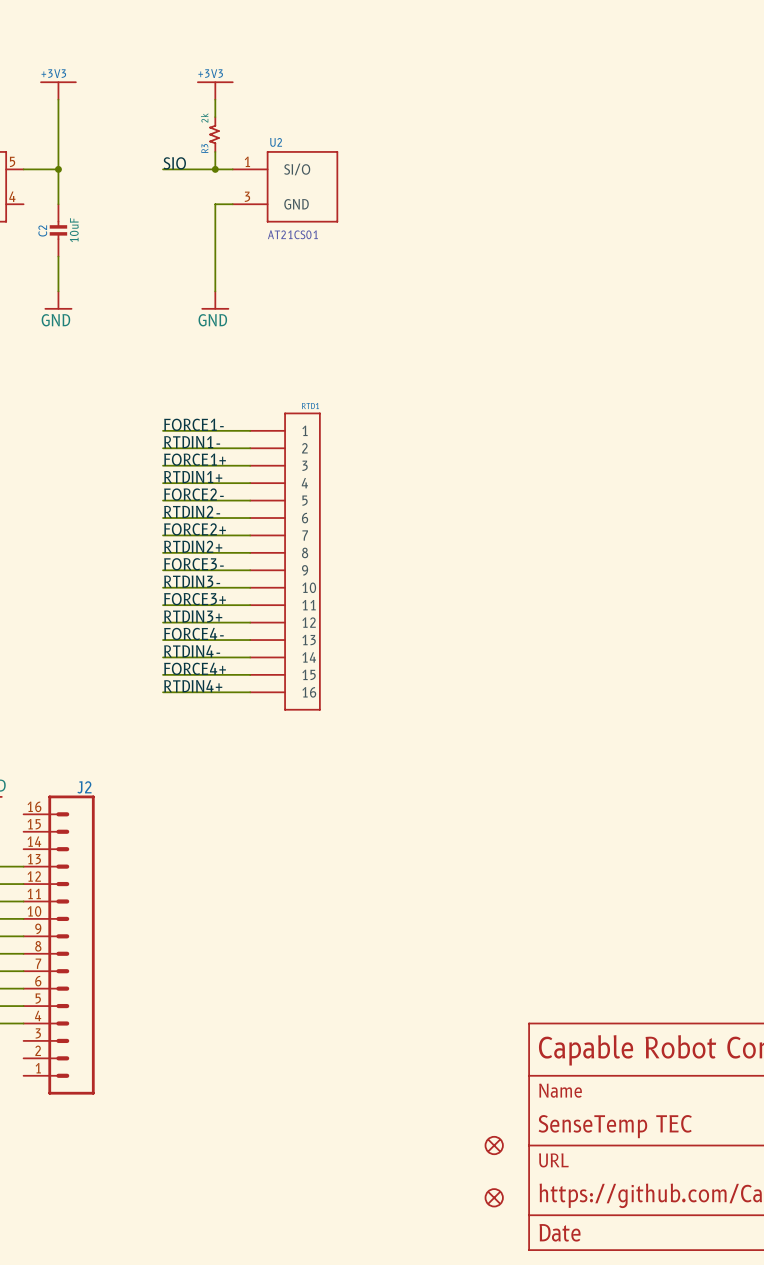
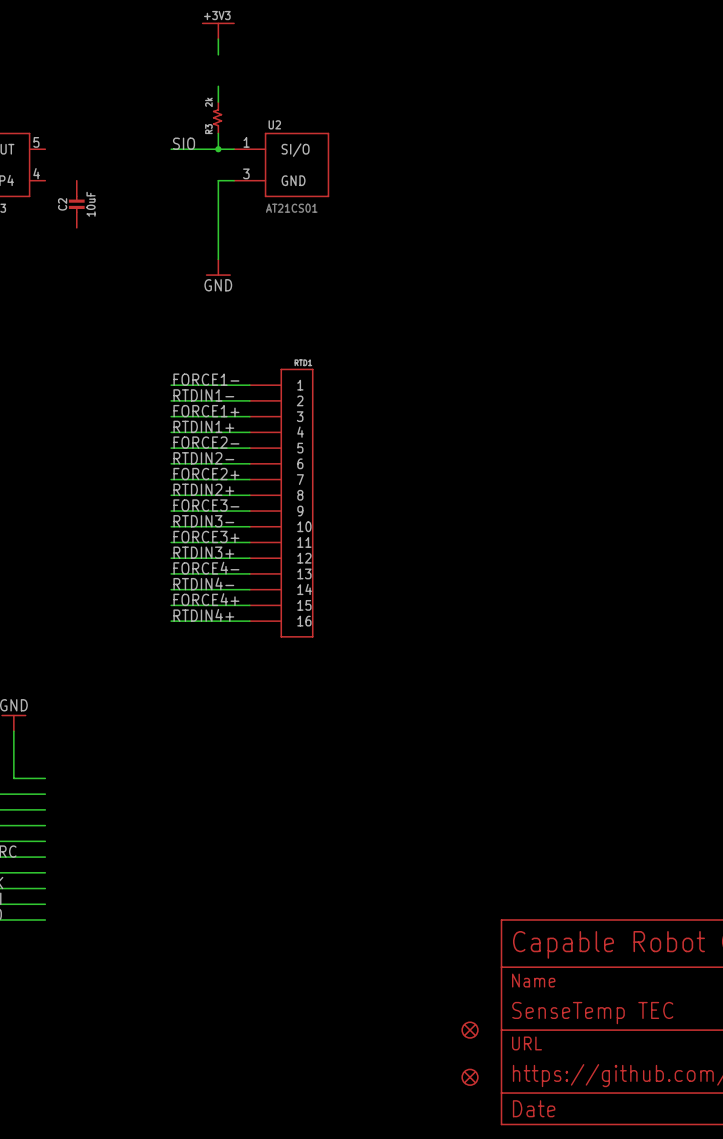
wire: none -> (218, 39) (218, 54)
power symbol: (58, 90) -> none
power symbol position: (215, 90) -> (218, 30)
wire: (58, 99) (58, 204) -> none
wire: (23, 169) (58, 169) -> none
junction: (58, 169) -> none
wire: (58, 256) (58, 291) -> none
power symbol: GND (58, 300) -> none
J2: (59, 945) -> none

